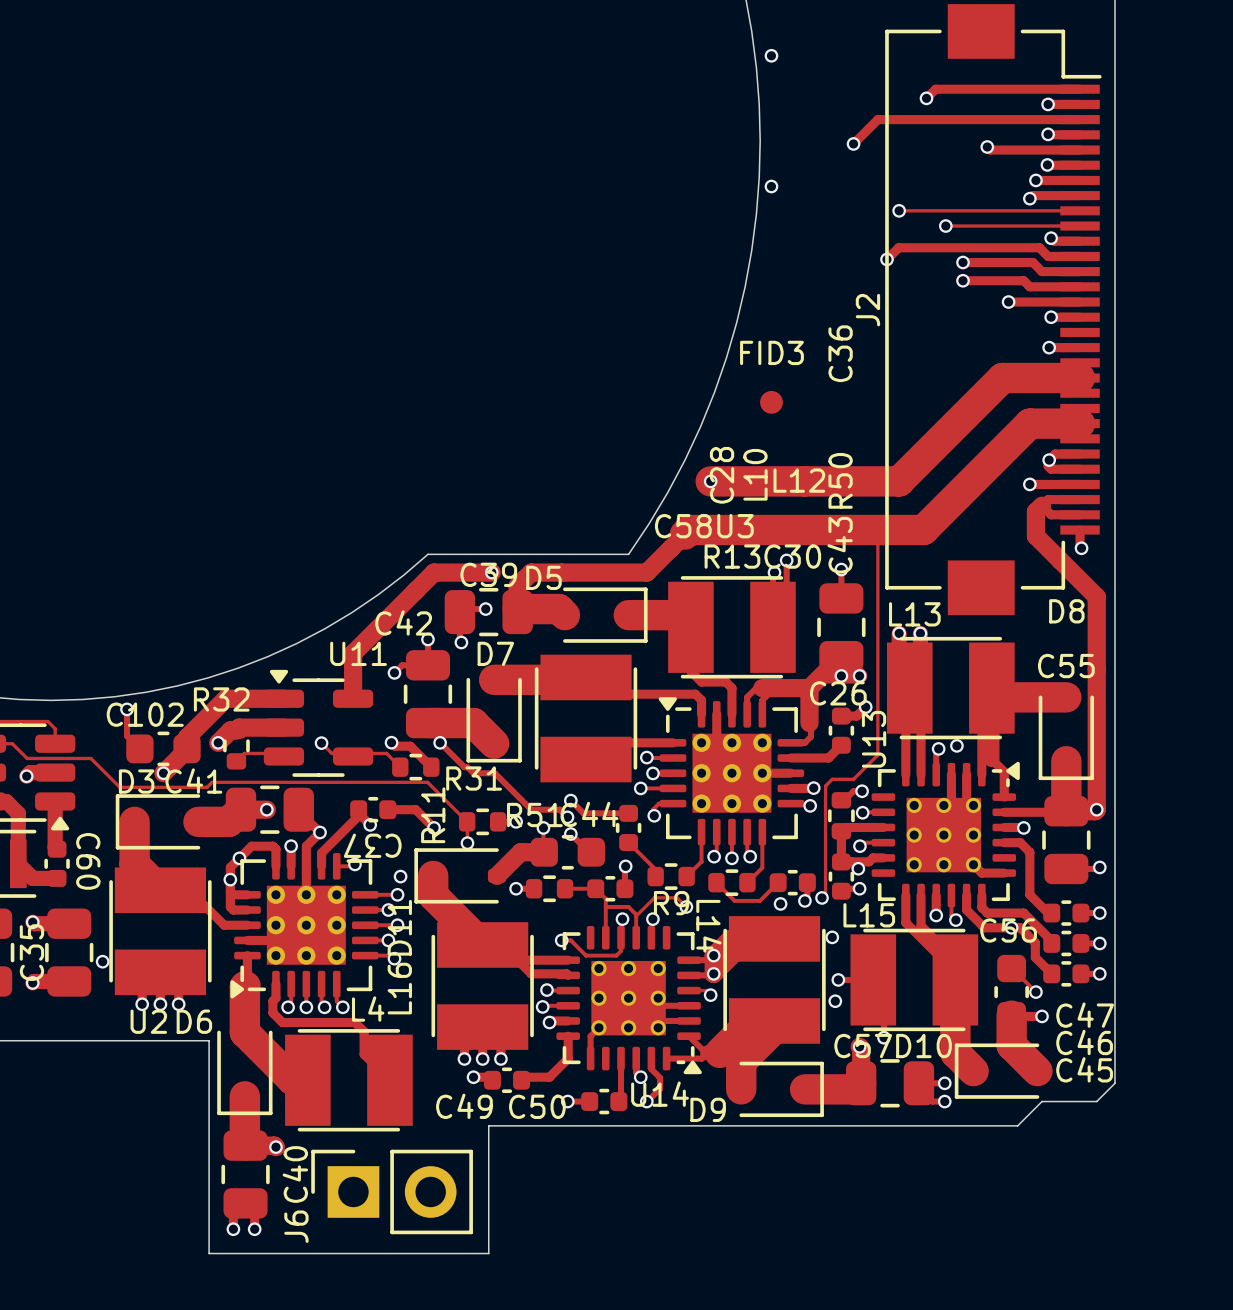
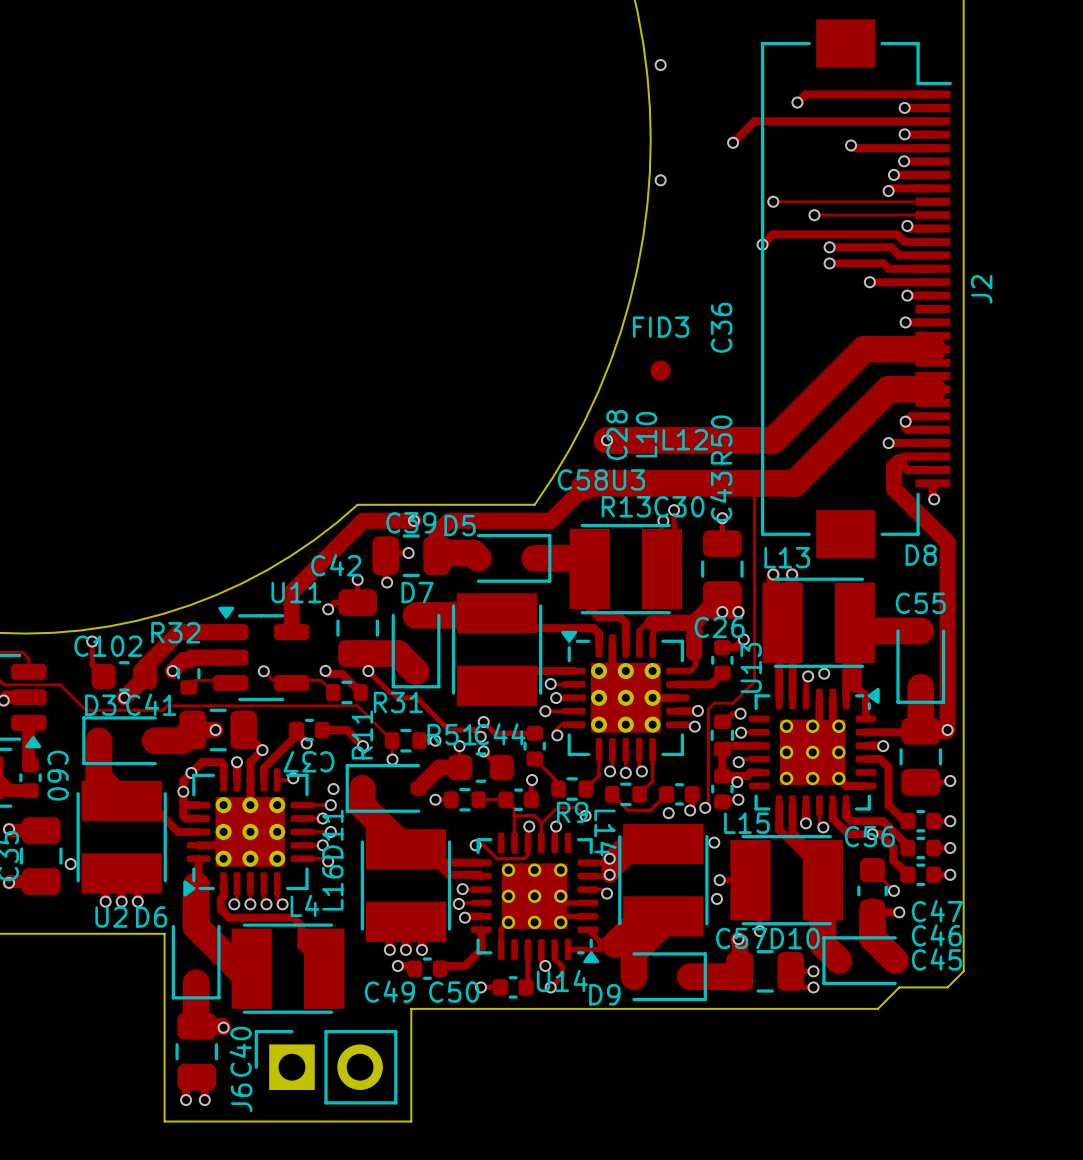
J2 name position: J2 (867, 310) -> J2 (981, 289)

